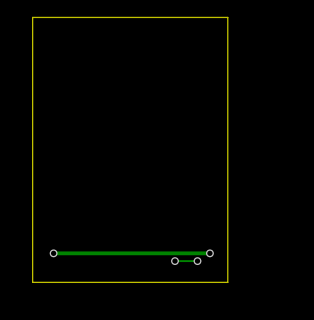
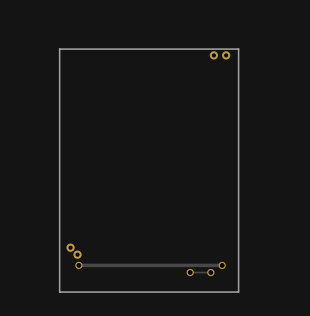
via: none -> (213, 55)
via: none -> (226, 55)
via: none -> (70, 247)
via: none -> (77, 254)

